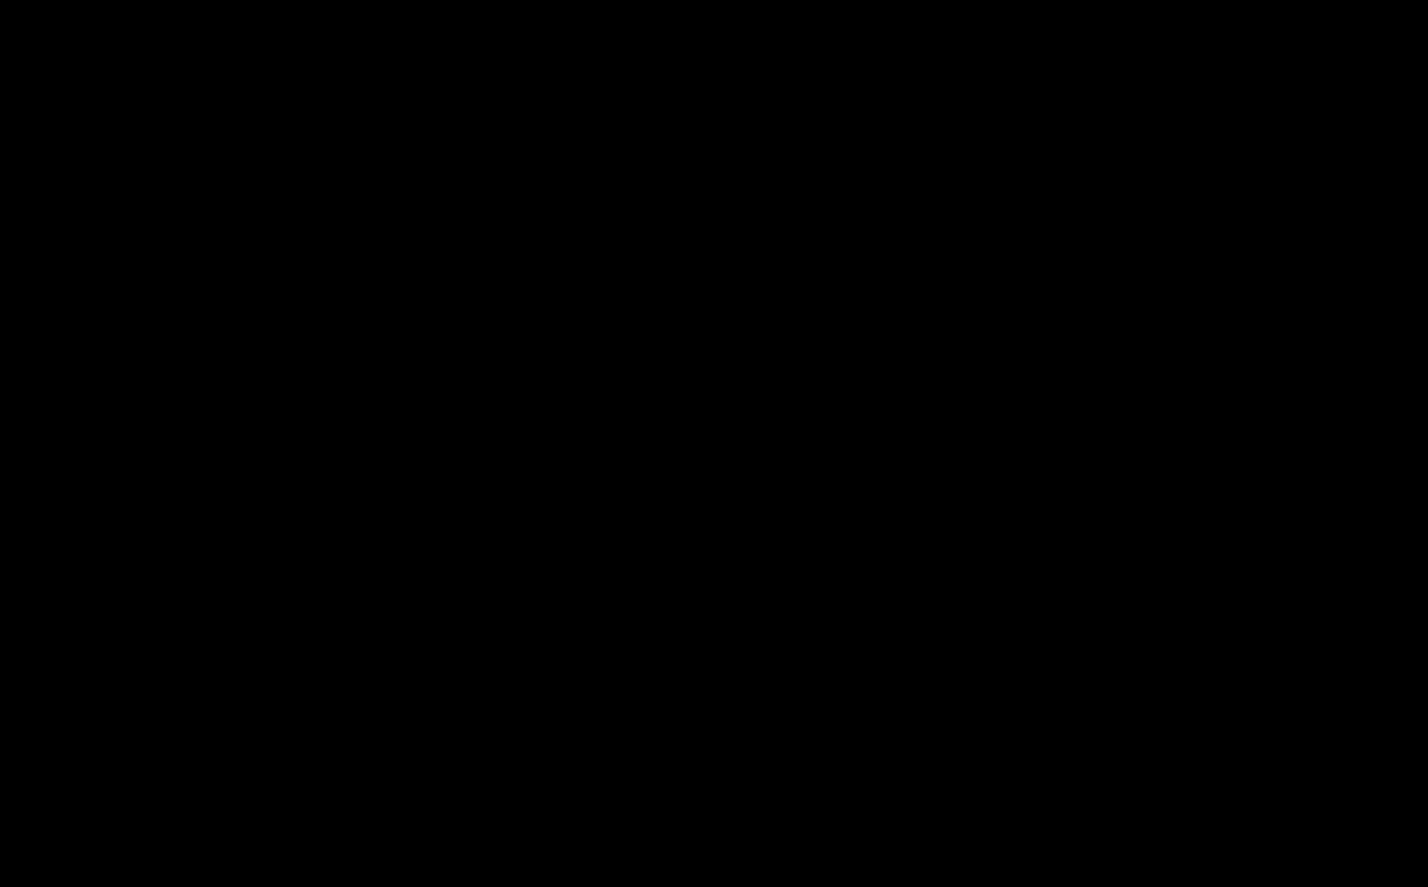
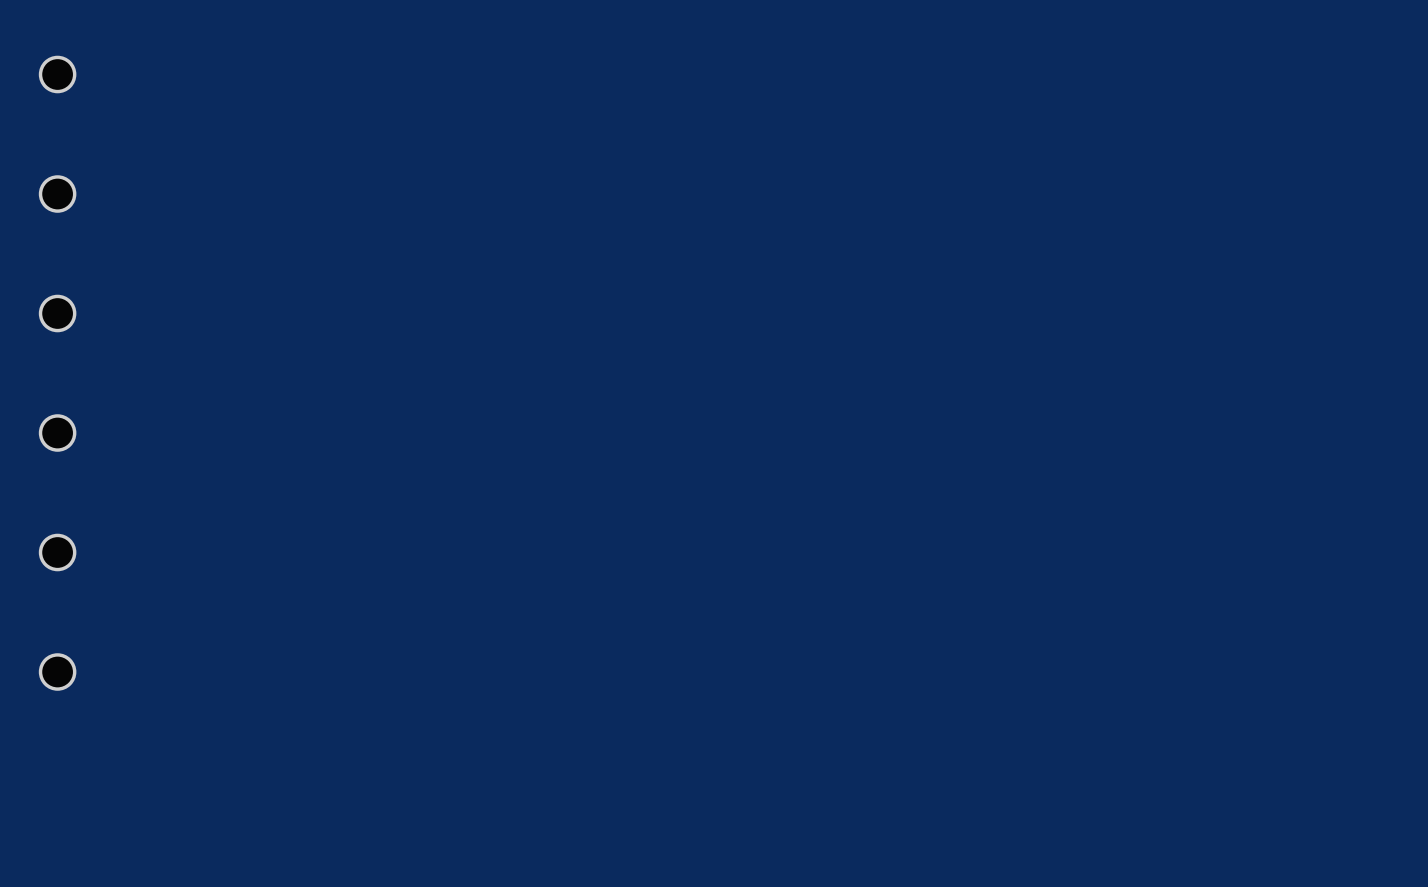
part: none -> (57, 373)

